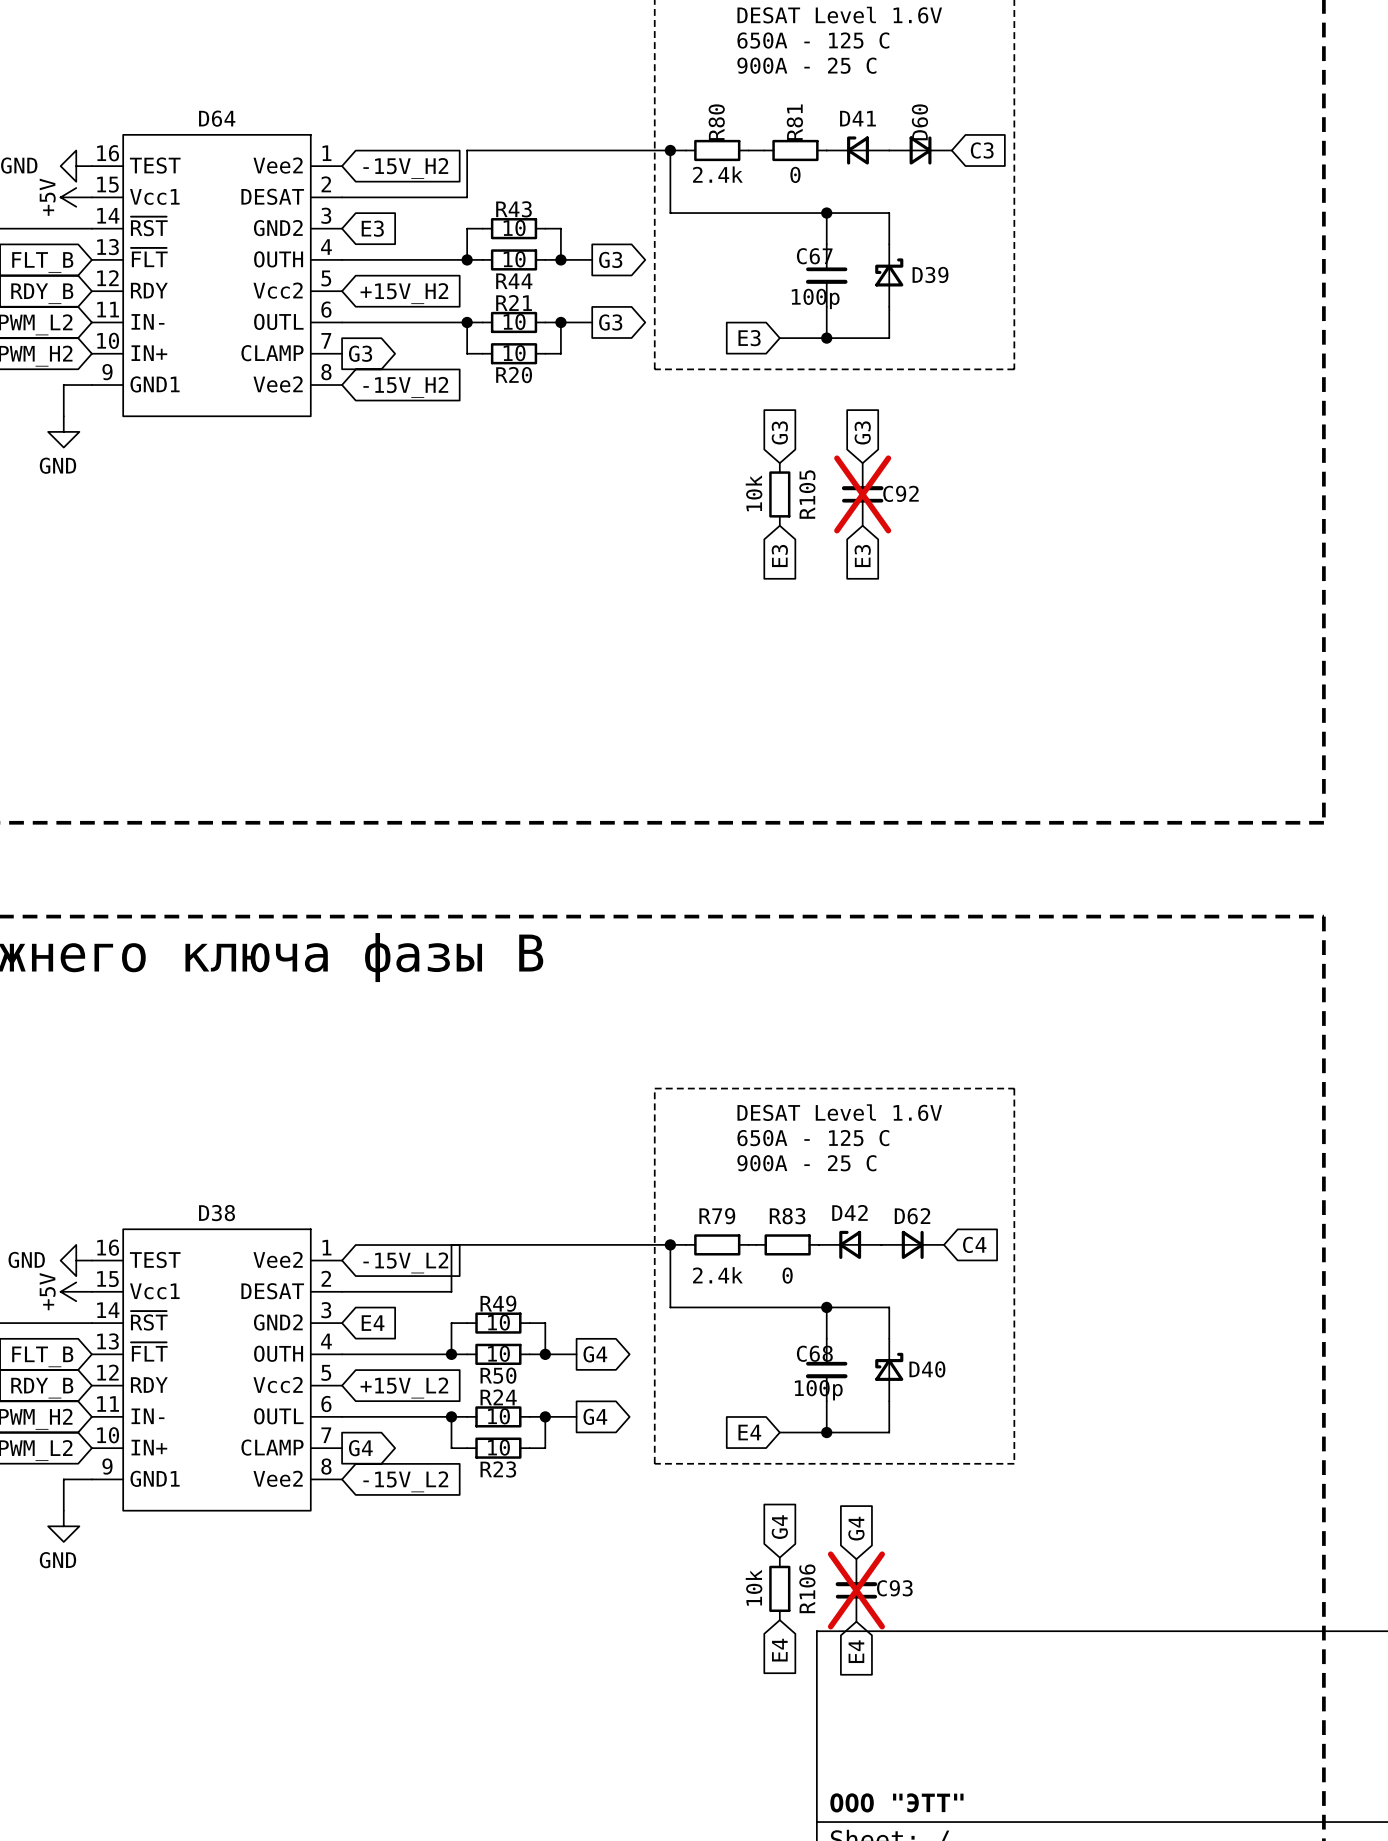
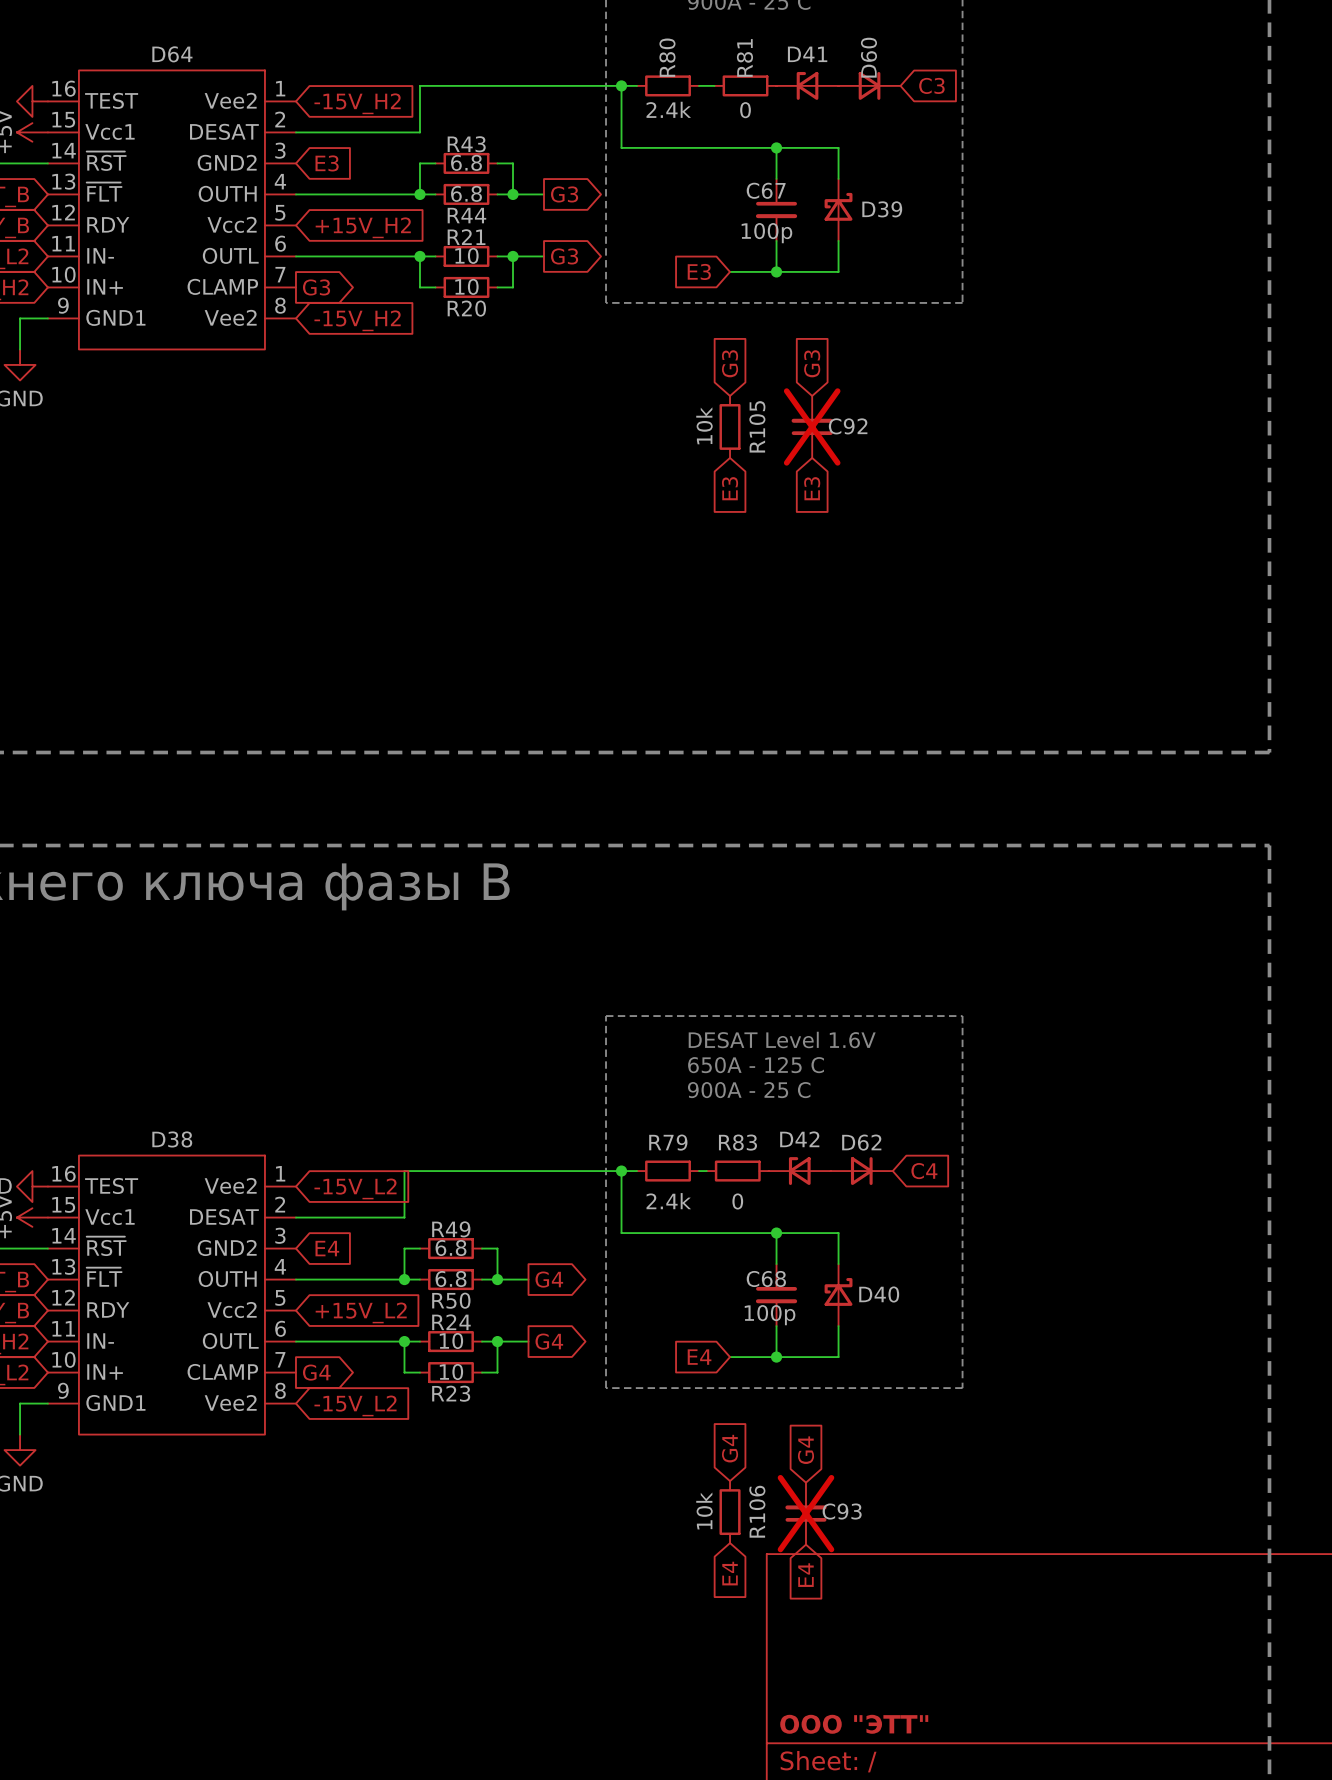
R43 value: 10 (514, 228) -> 6.8 (466, 162)
R44 value: 10 (514, 259) -> 6.8 (466, 193)
R49 value: 10 (498, 1322) -> 6.8 (451, 1247)
R50 value: 10 (498, 1353) -> 6.8 (451, 1278)

